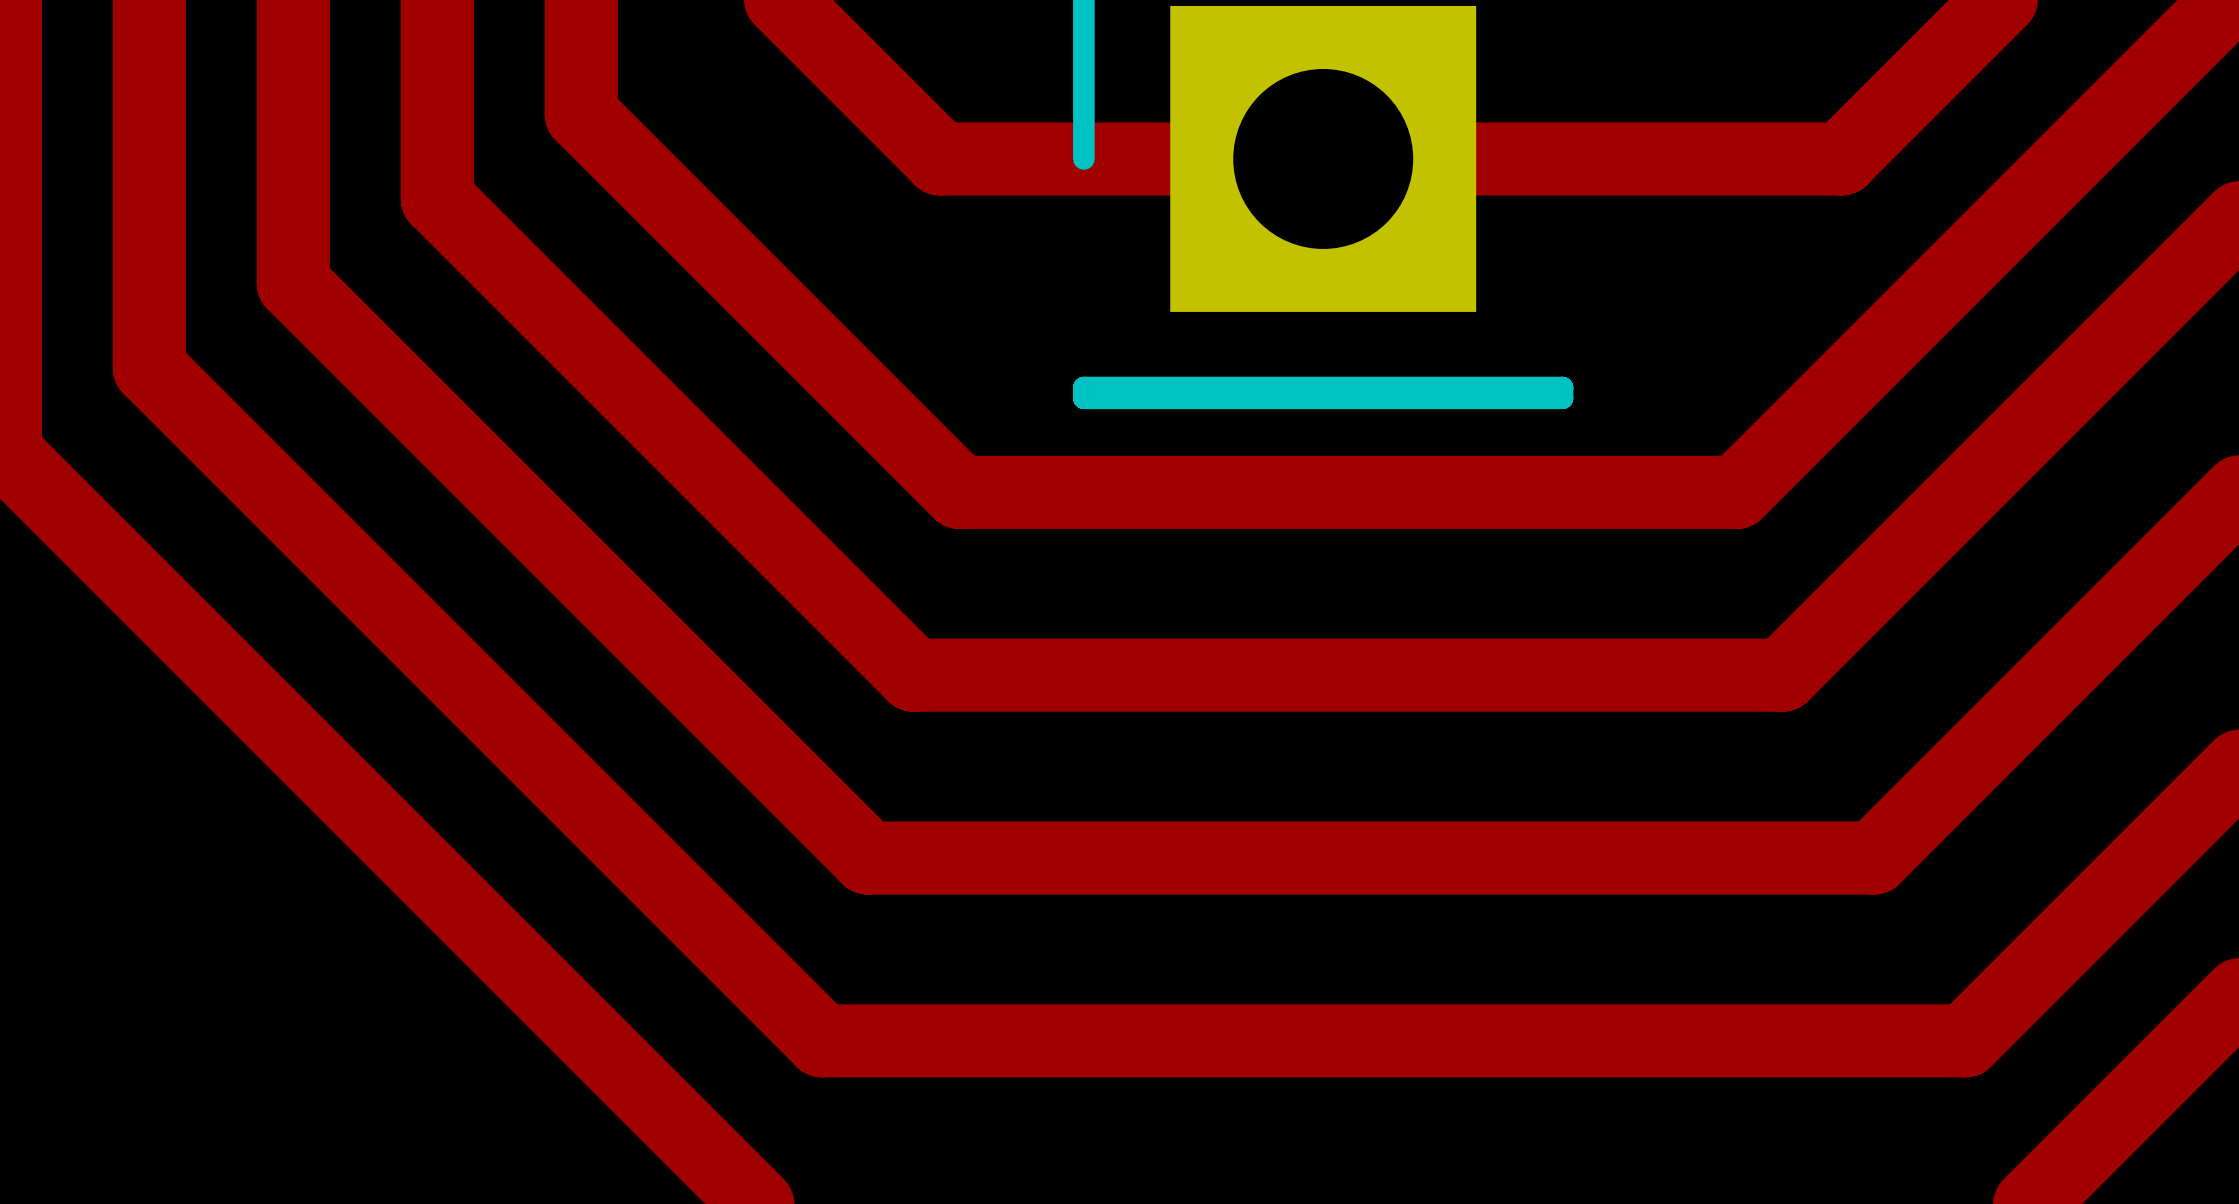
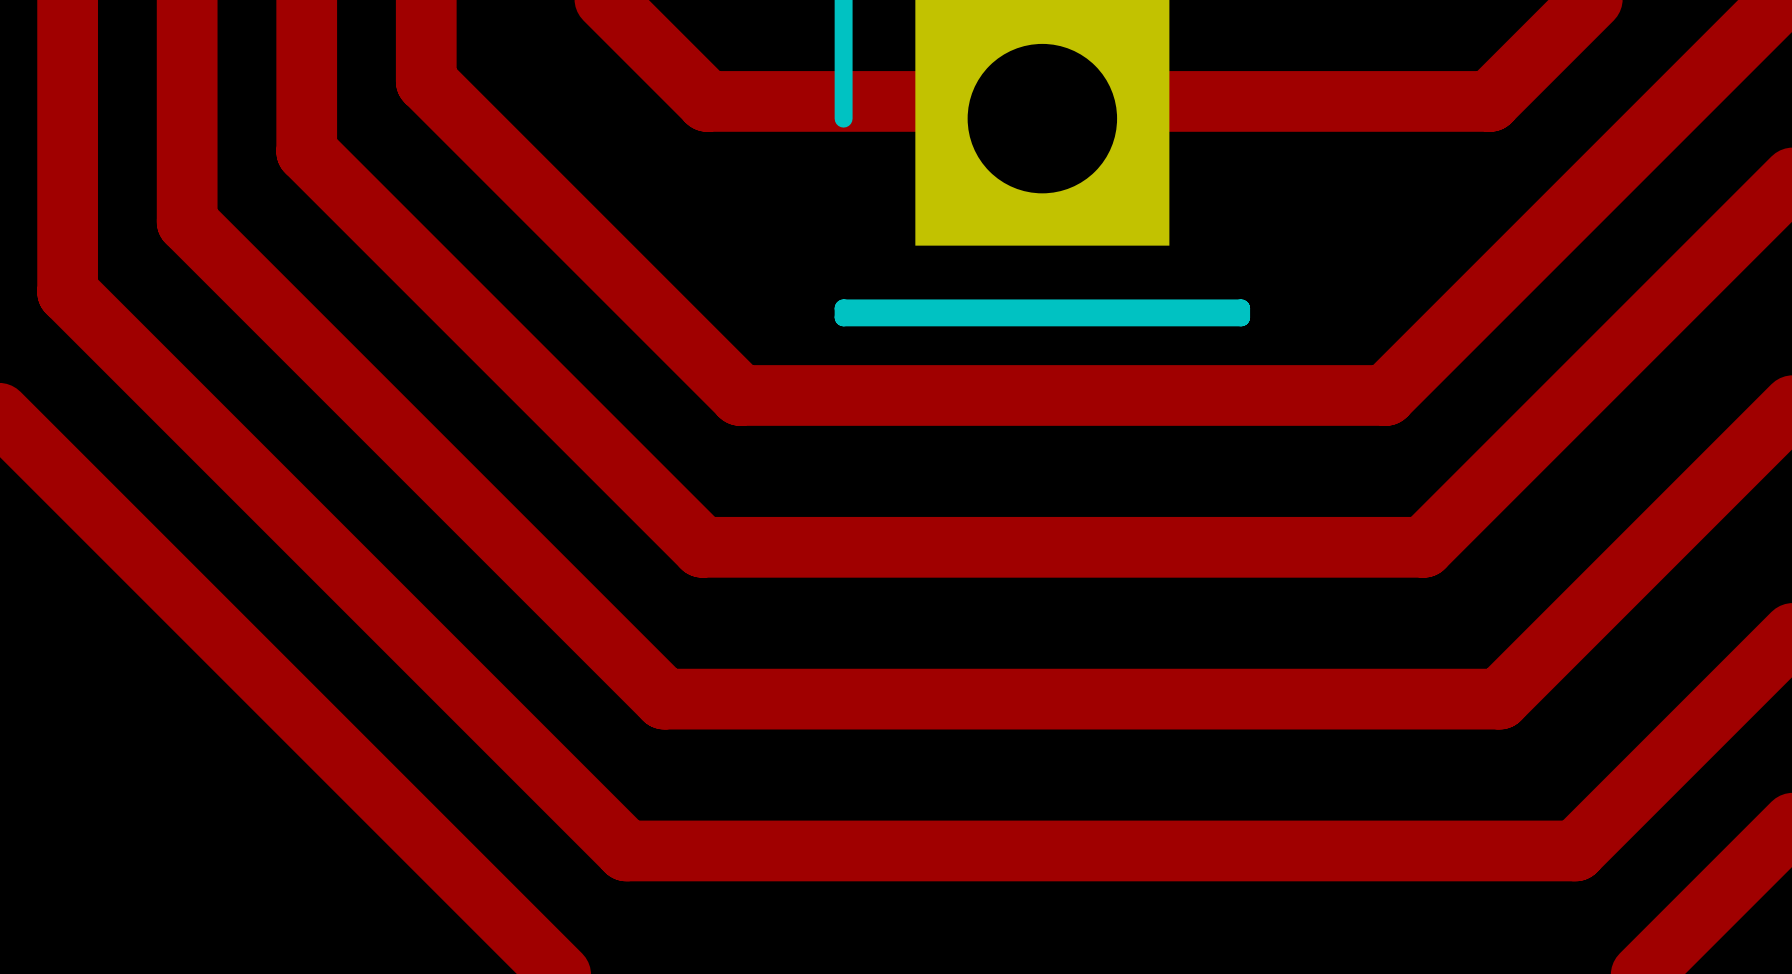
track: (919, 138) (940, 158) (1841, 158) (1862, 138) -> (707, 101) (1489, 101)

